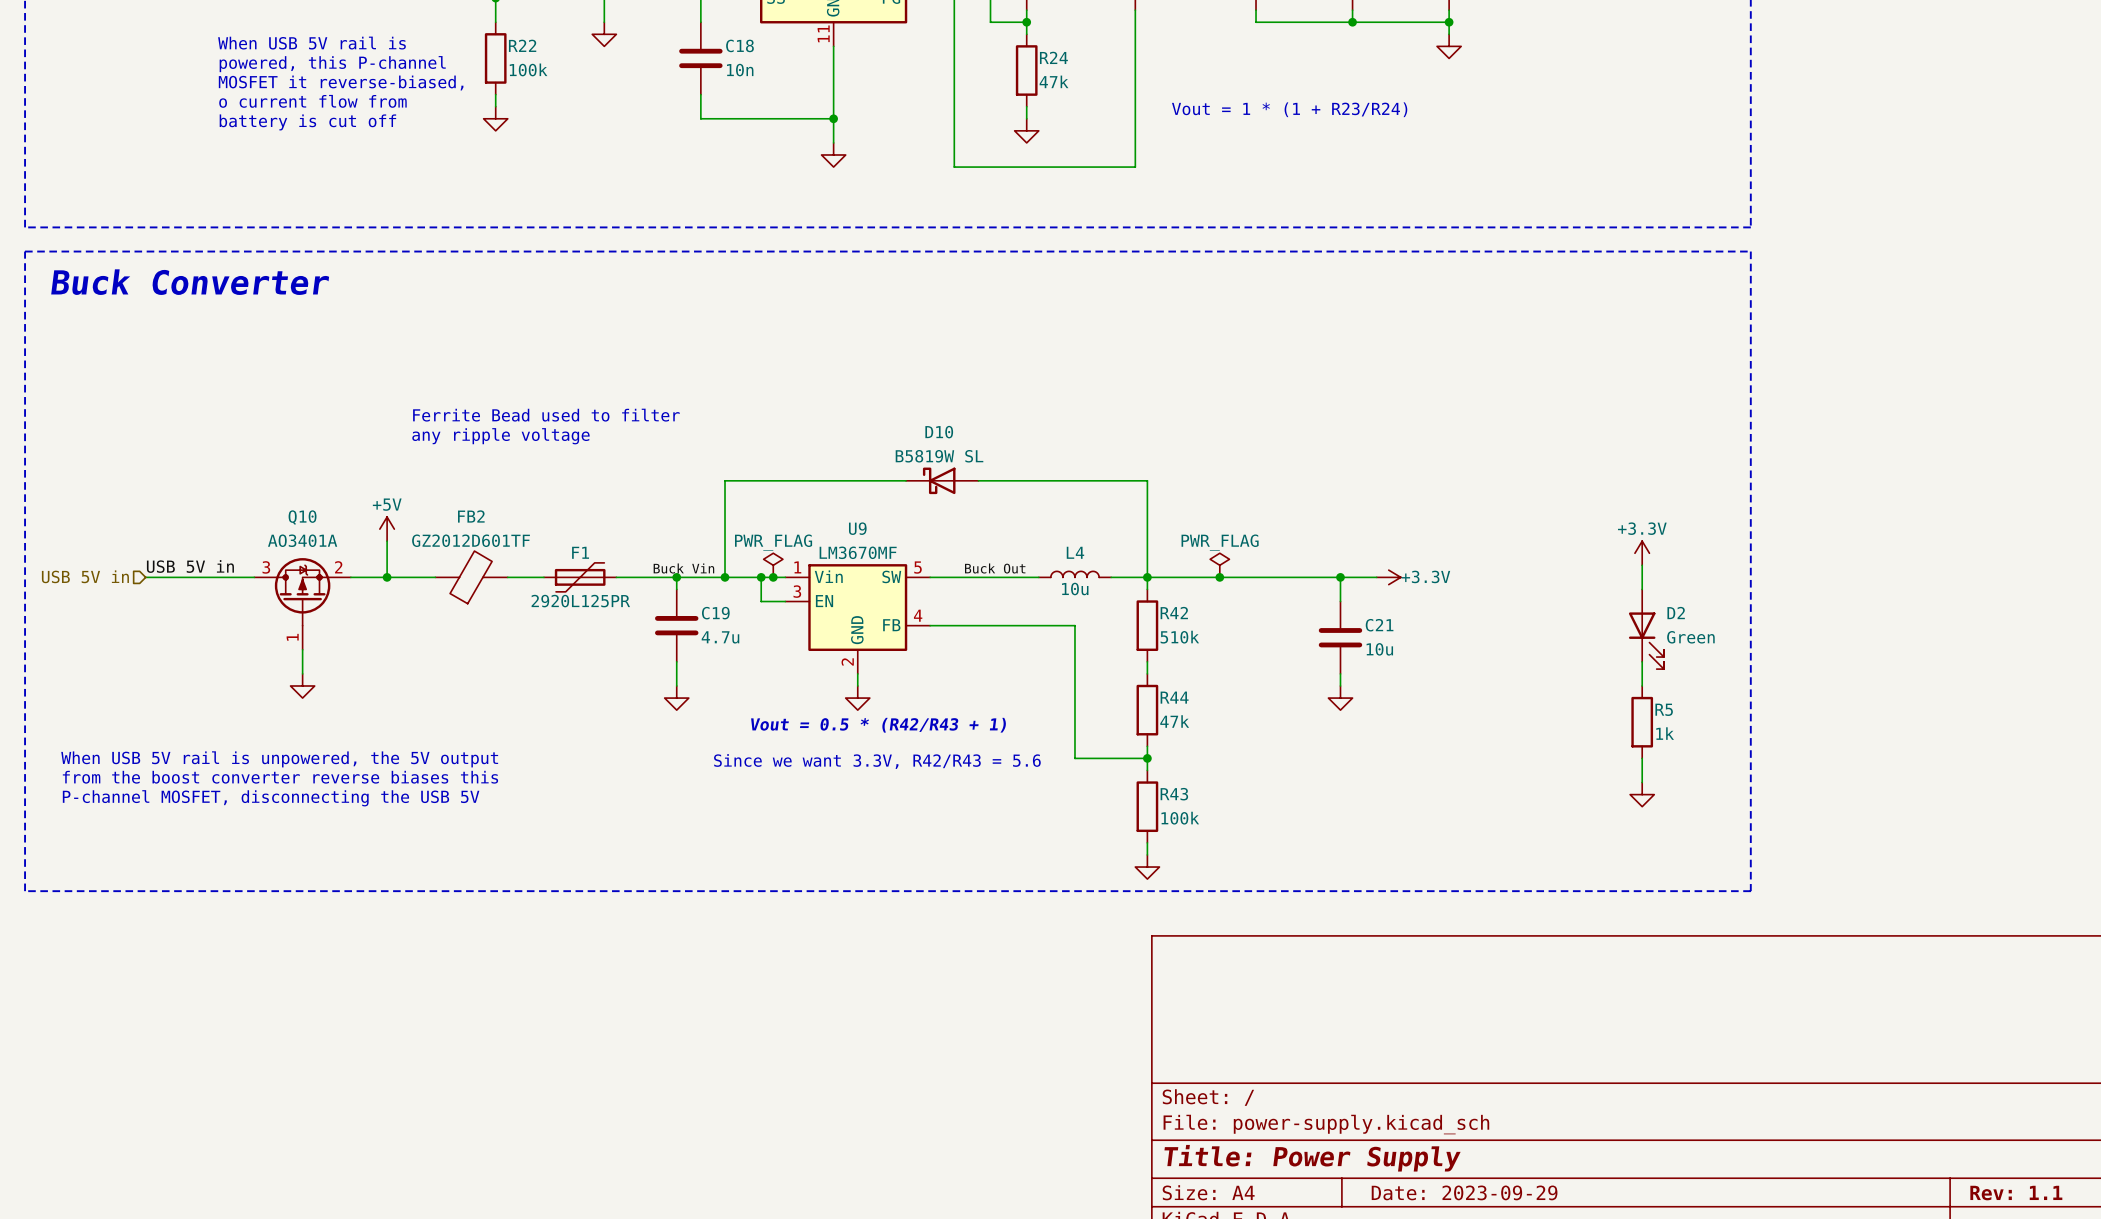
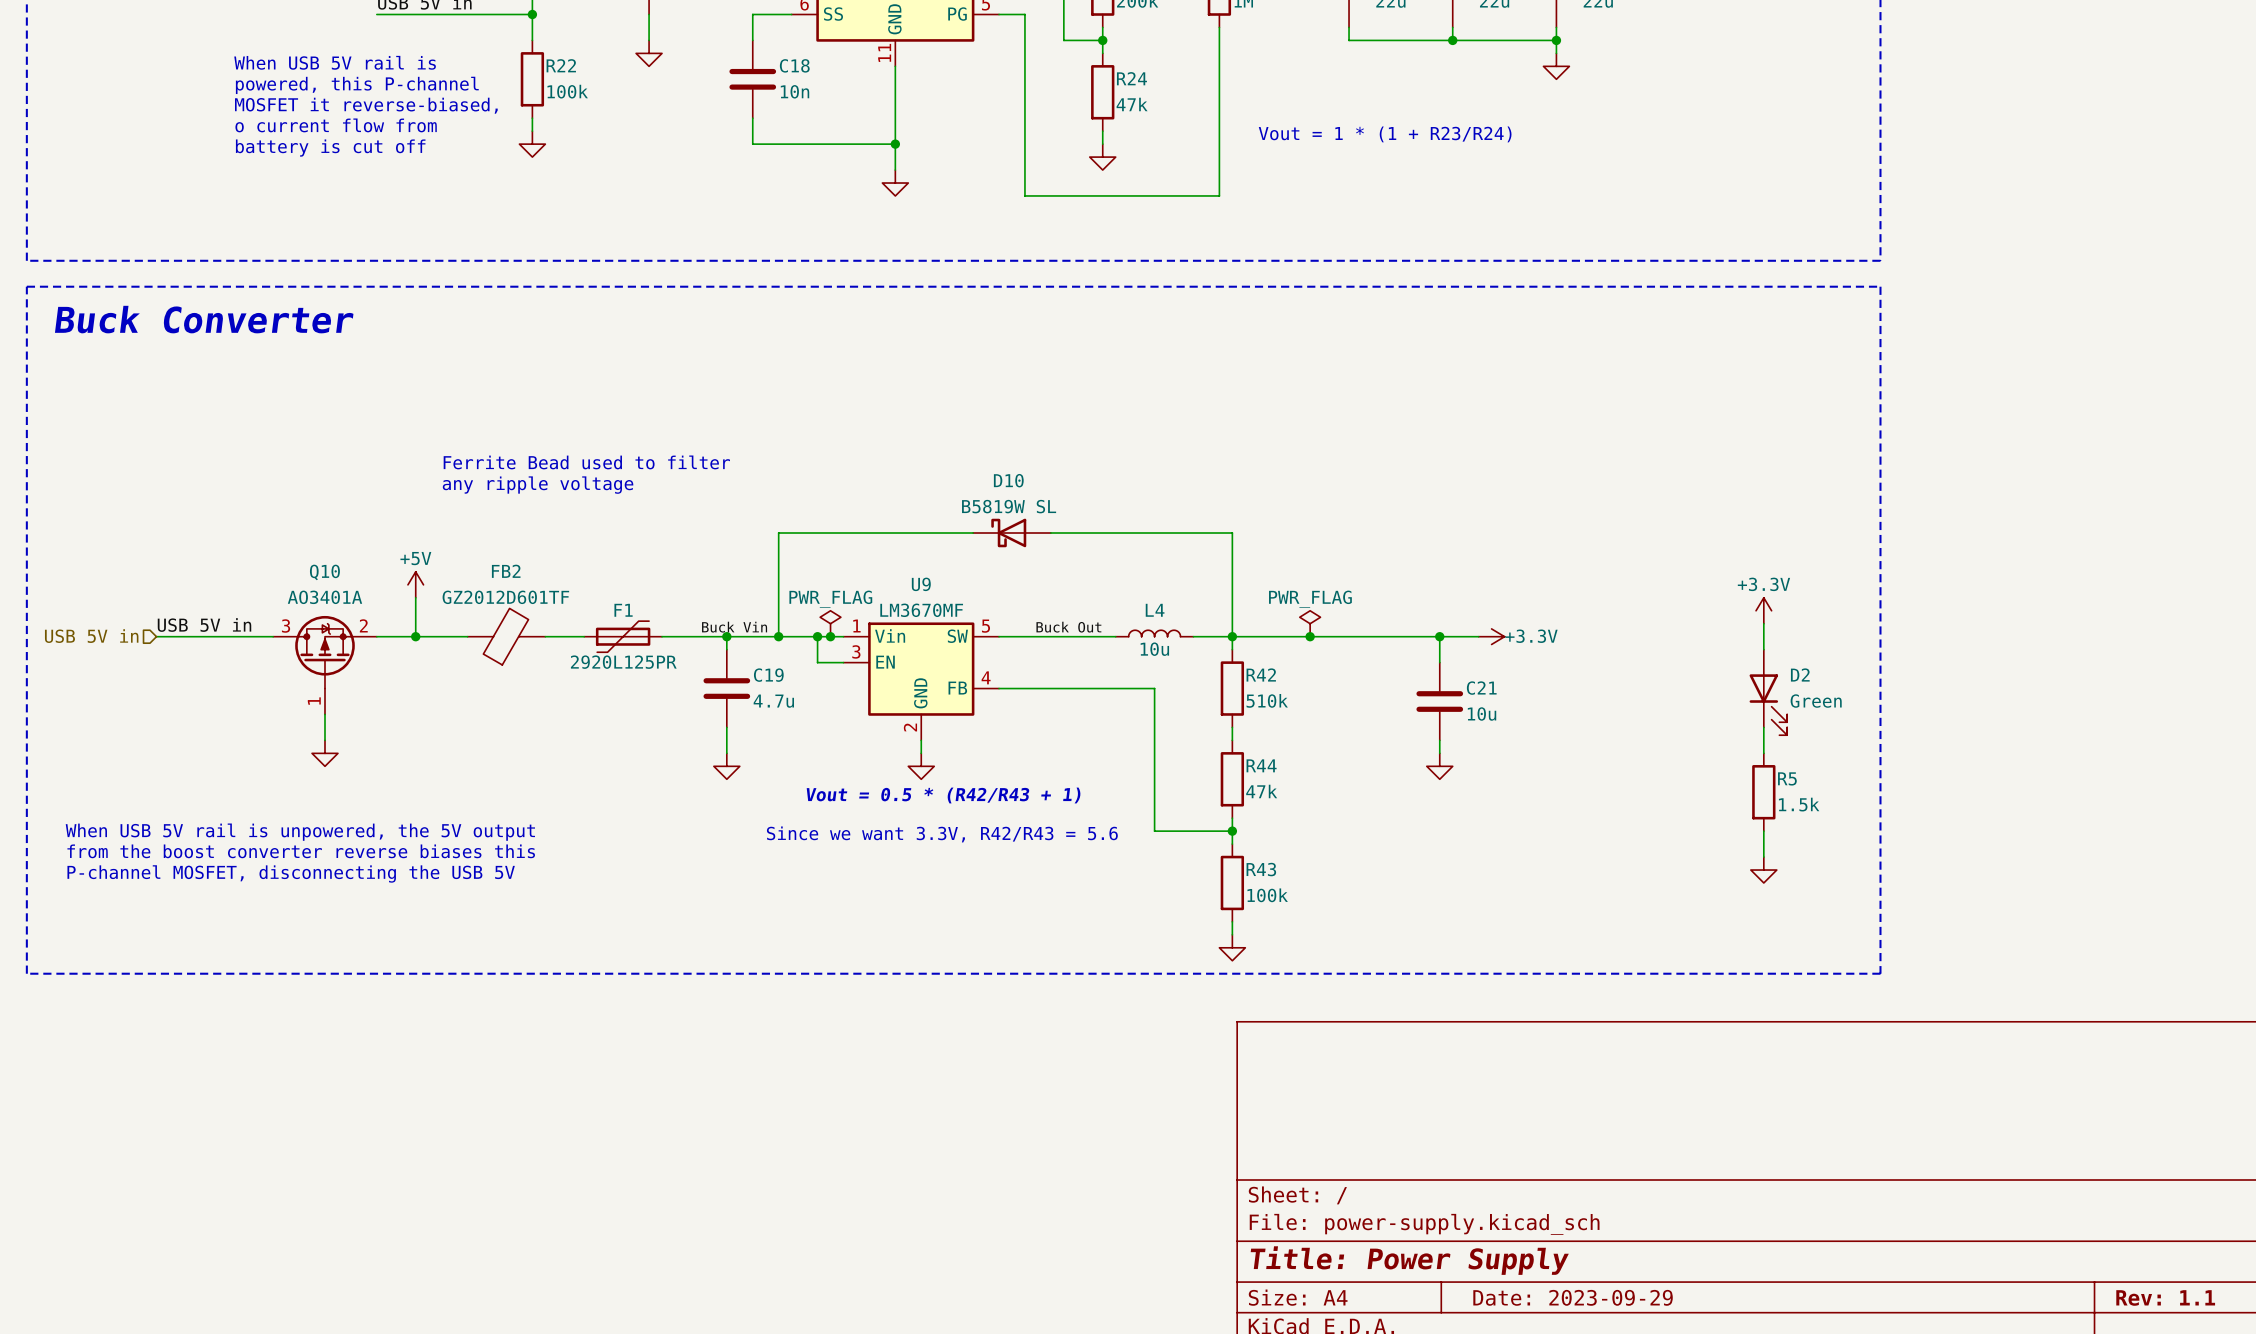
R5 value: 1k (1665, 733) -> 1.5k (1799, 804)

